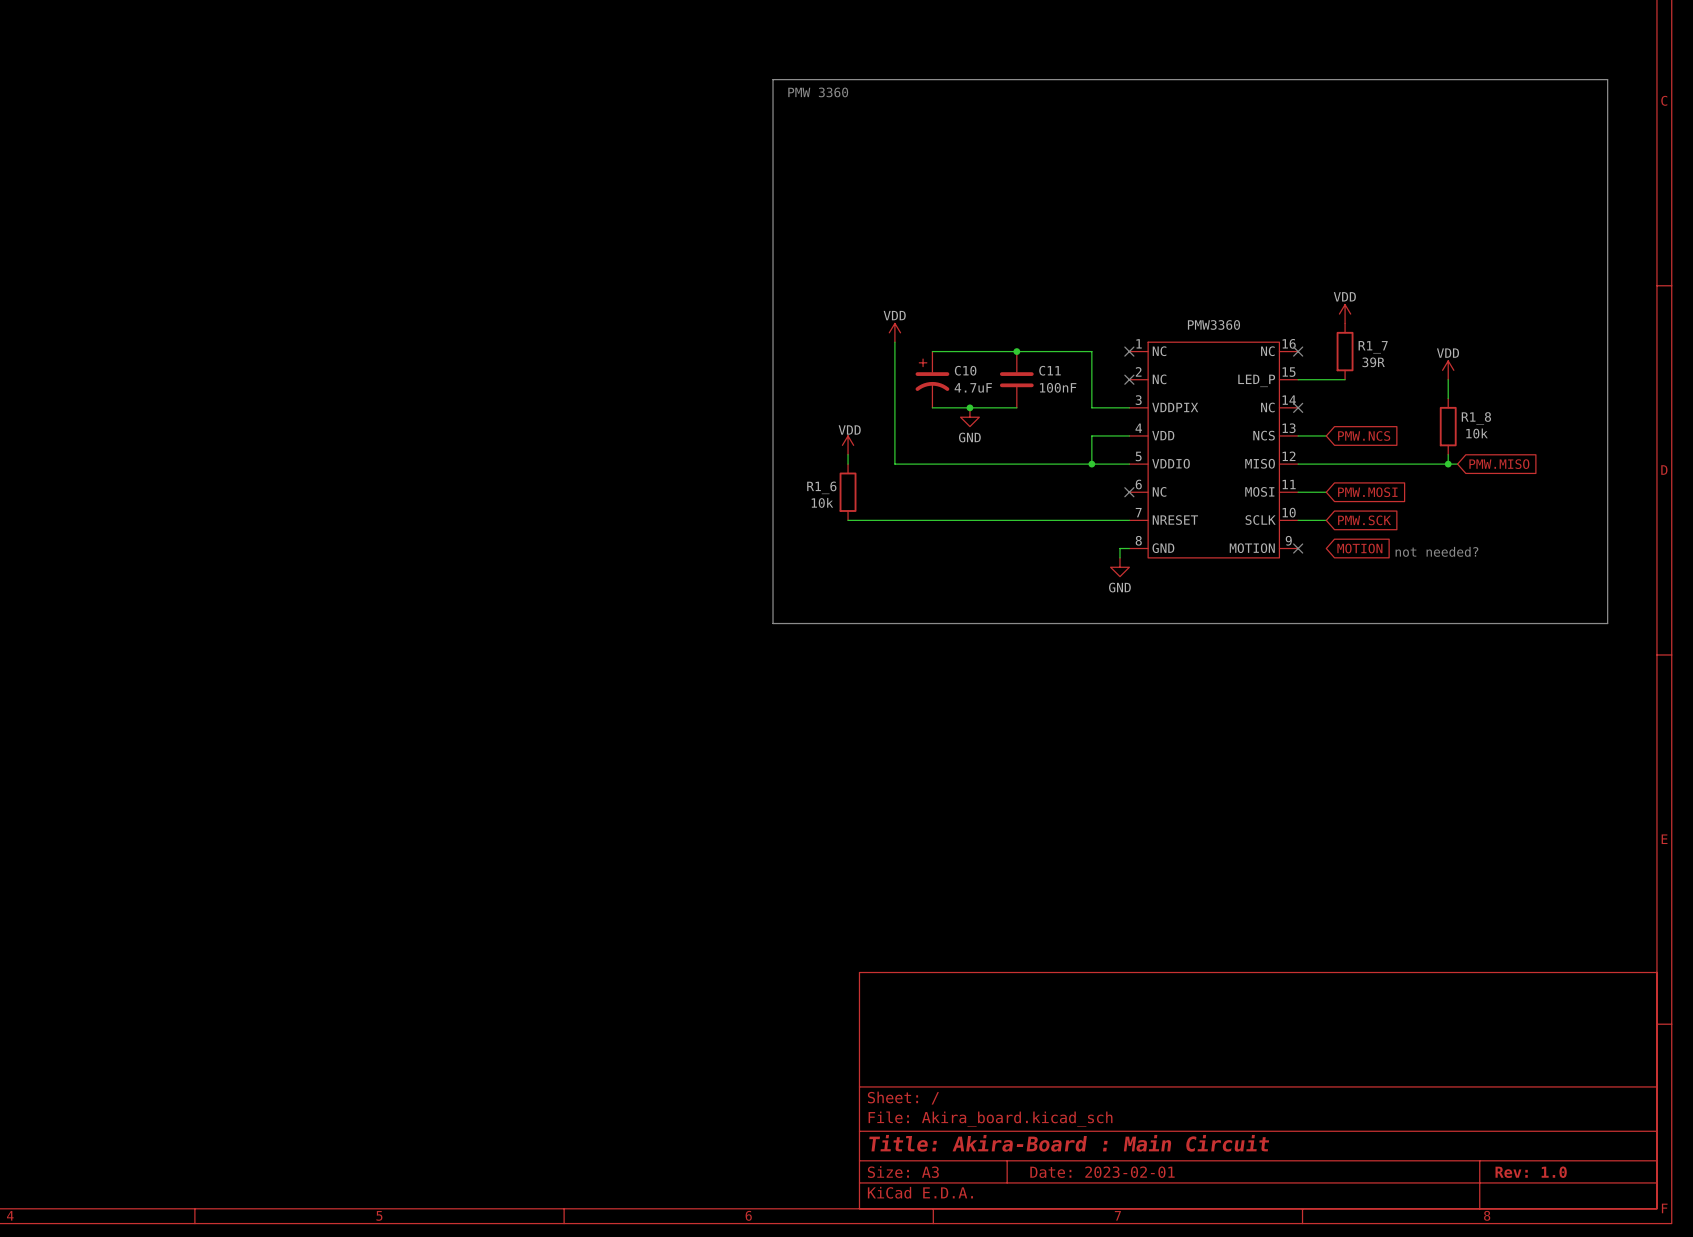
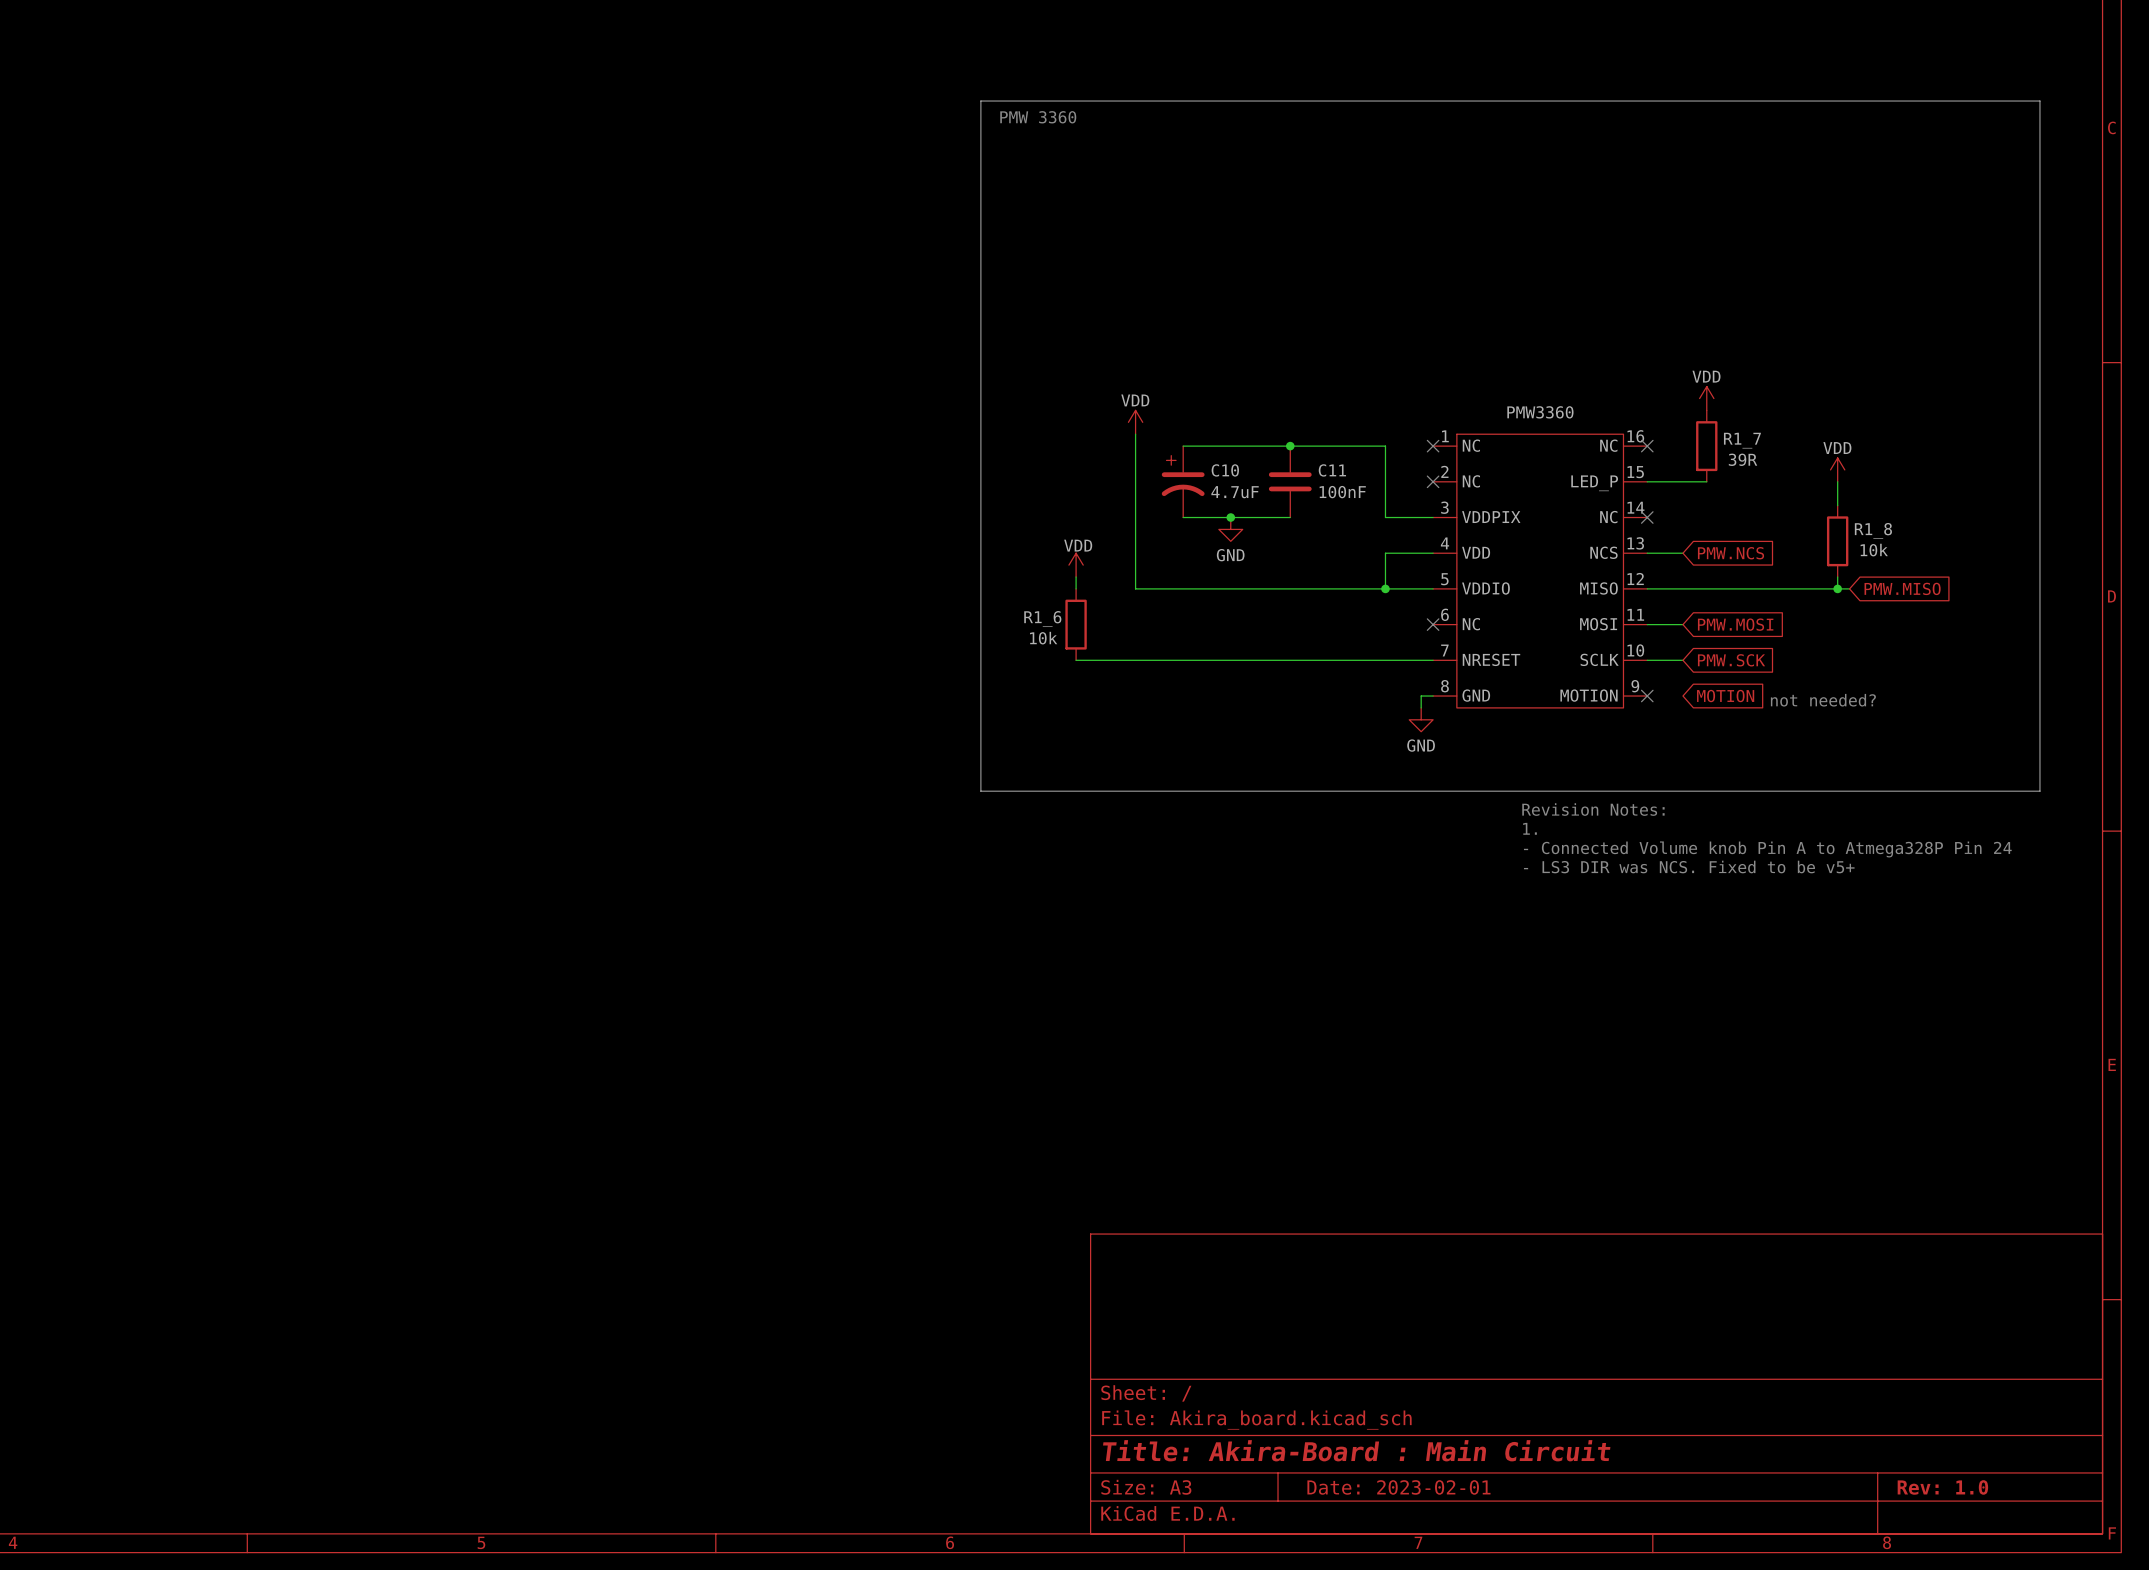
text: none -> Revision Notes: (1593, 809)
text: none -> 1. (1529, 828)
text: none -> - Connected Volume knob Pin A to Atmega328P Pin 24 (1767, 849)
text: none -> - LS3 DIR was NCS. Fixed to be v5+ (1689, 867)

